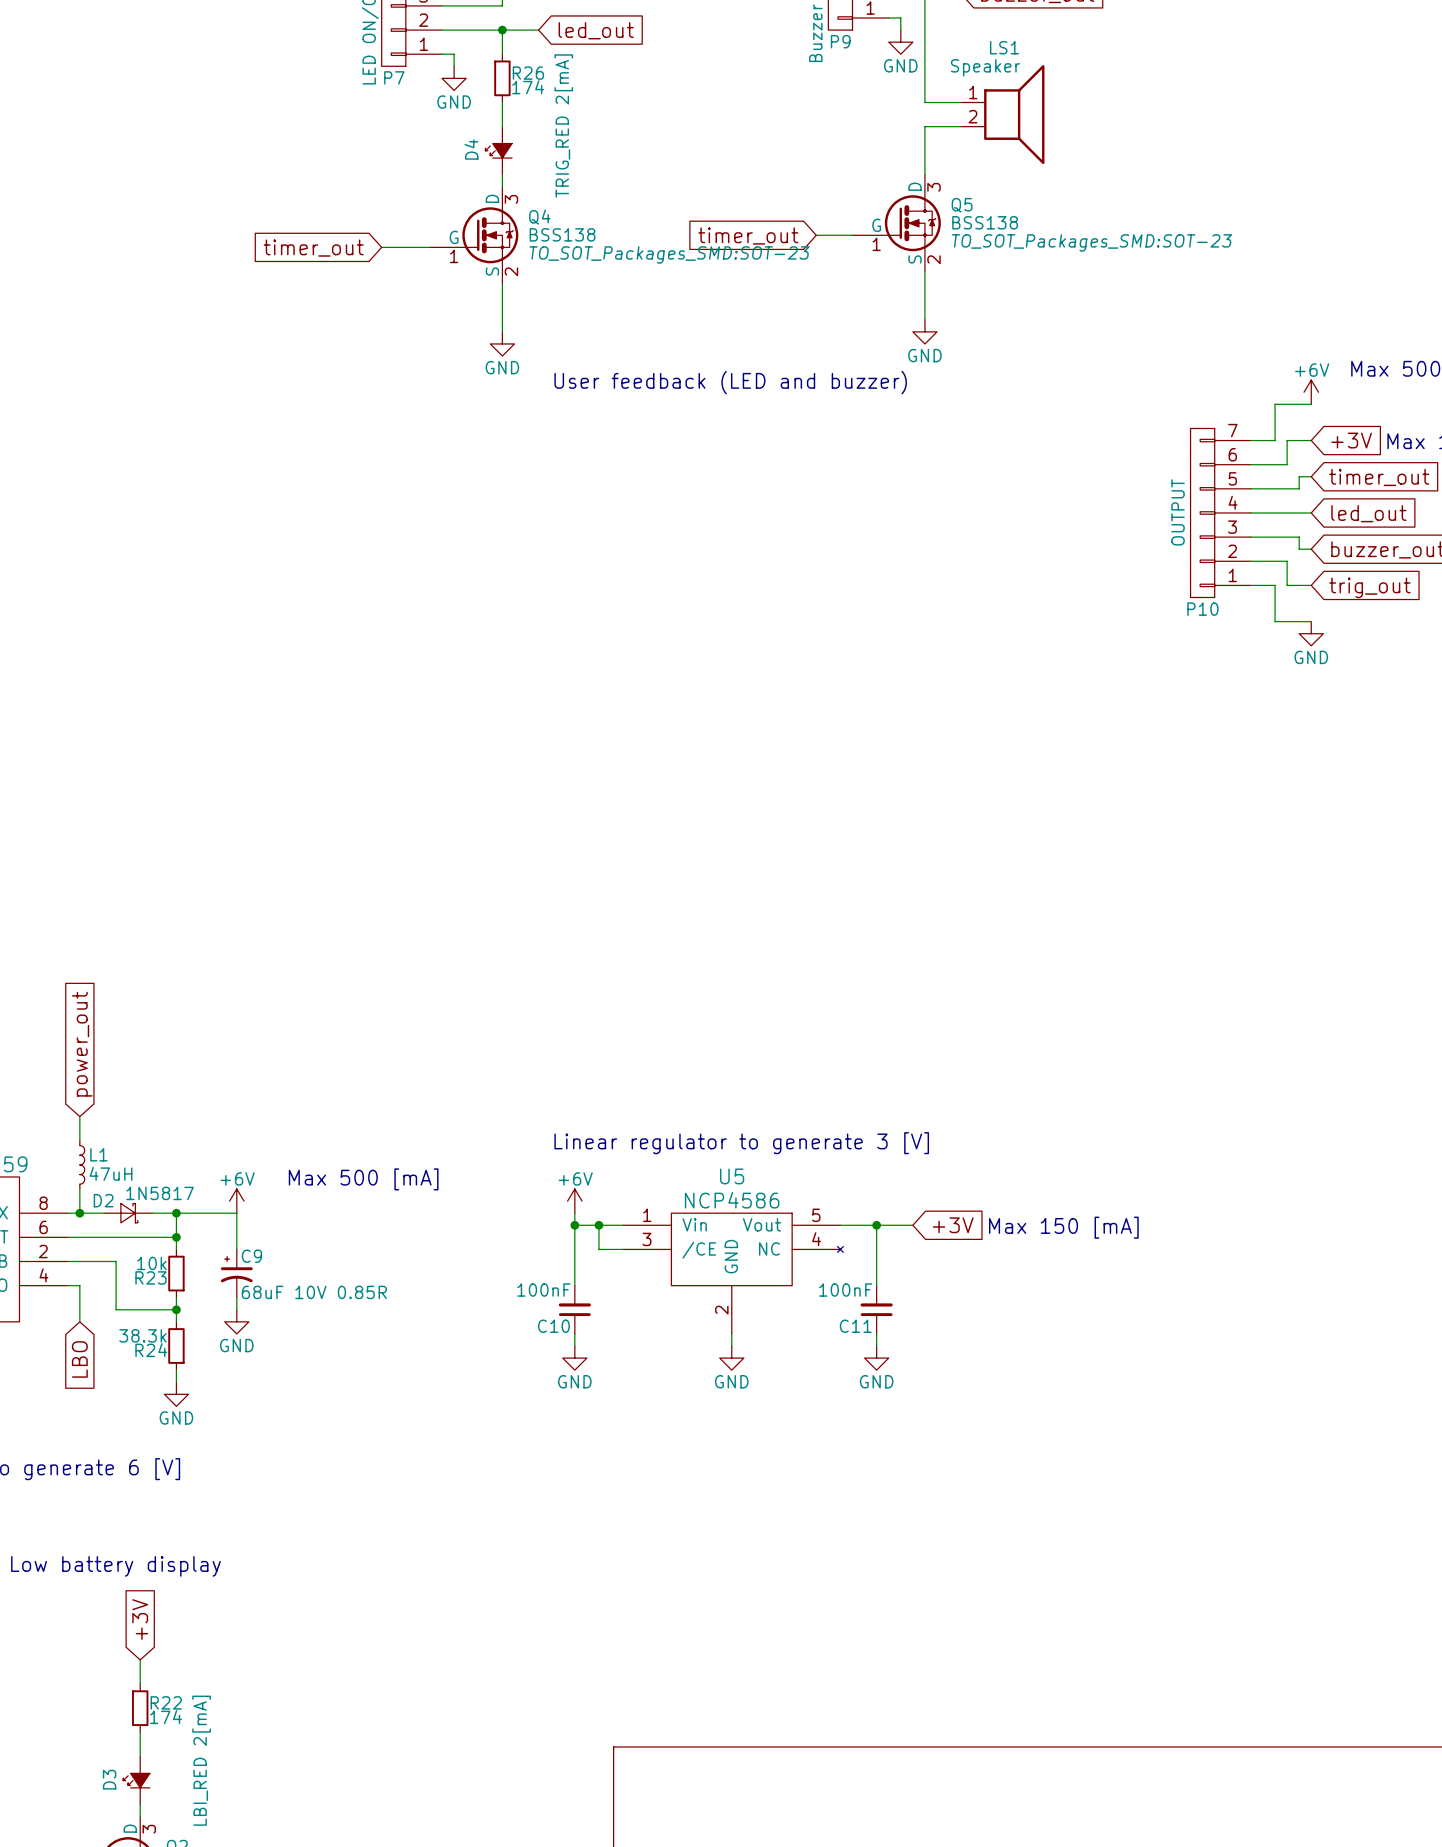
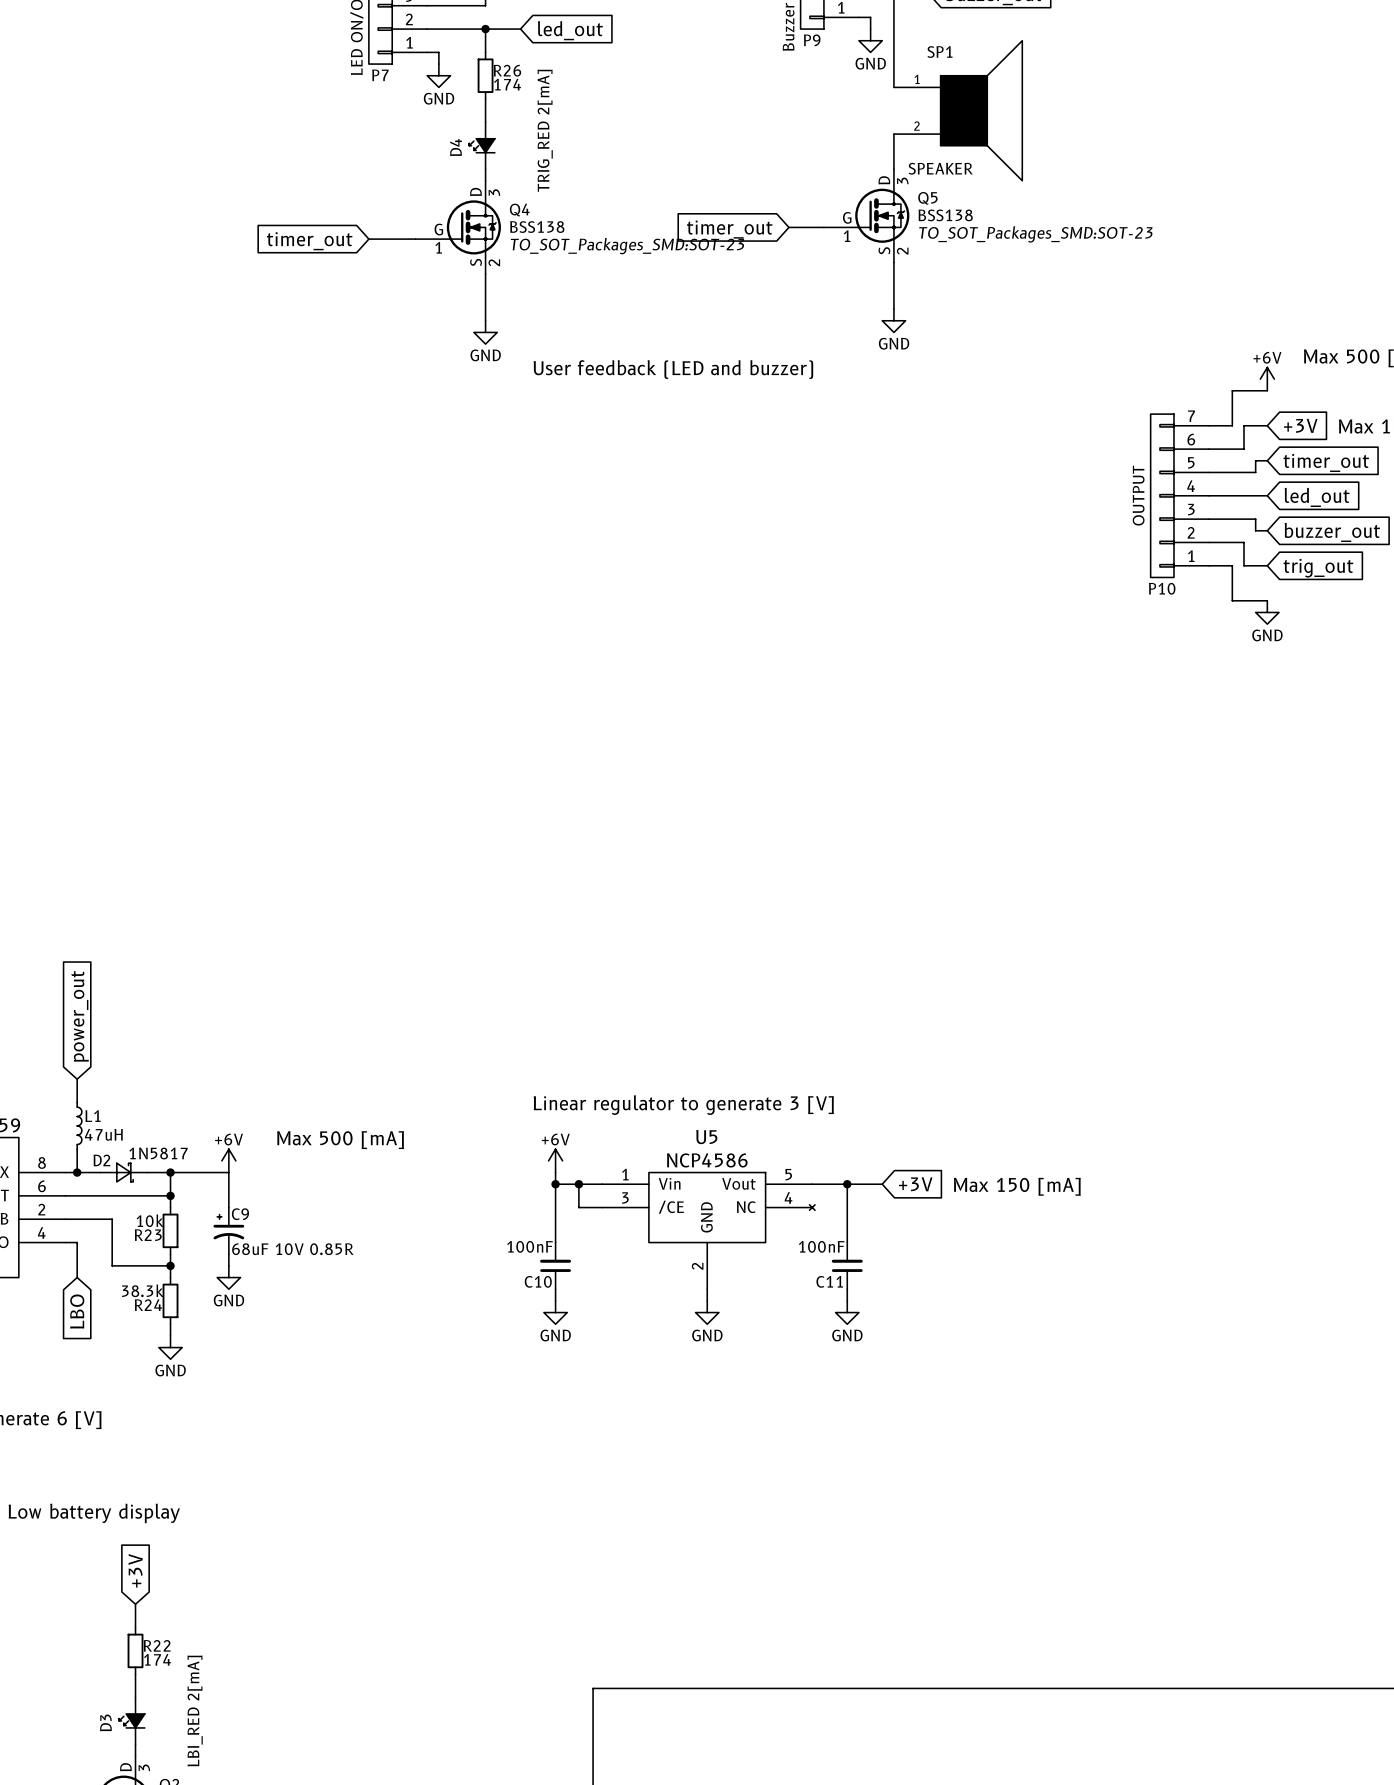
wire: (924, 90) (924, 102) (961, 102) -> none
SP1: none -> SPEAKER (958, 110)
LS1: Speaker (1002, 114) -> none
wire: (961, 126) (924, 126) (924, 138) -> none

